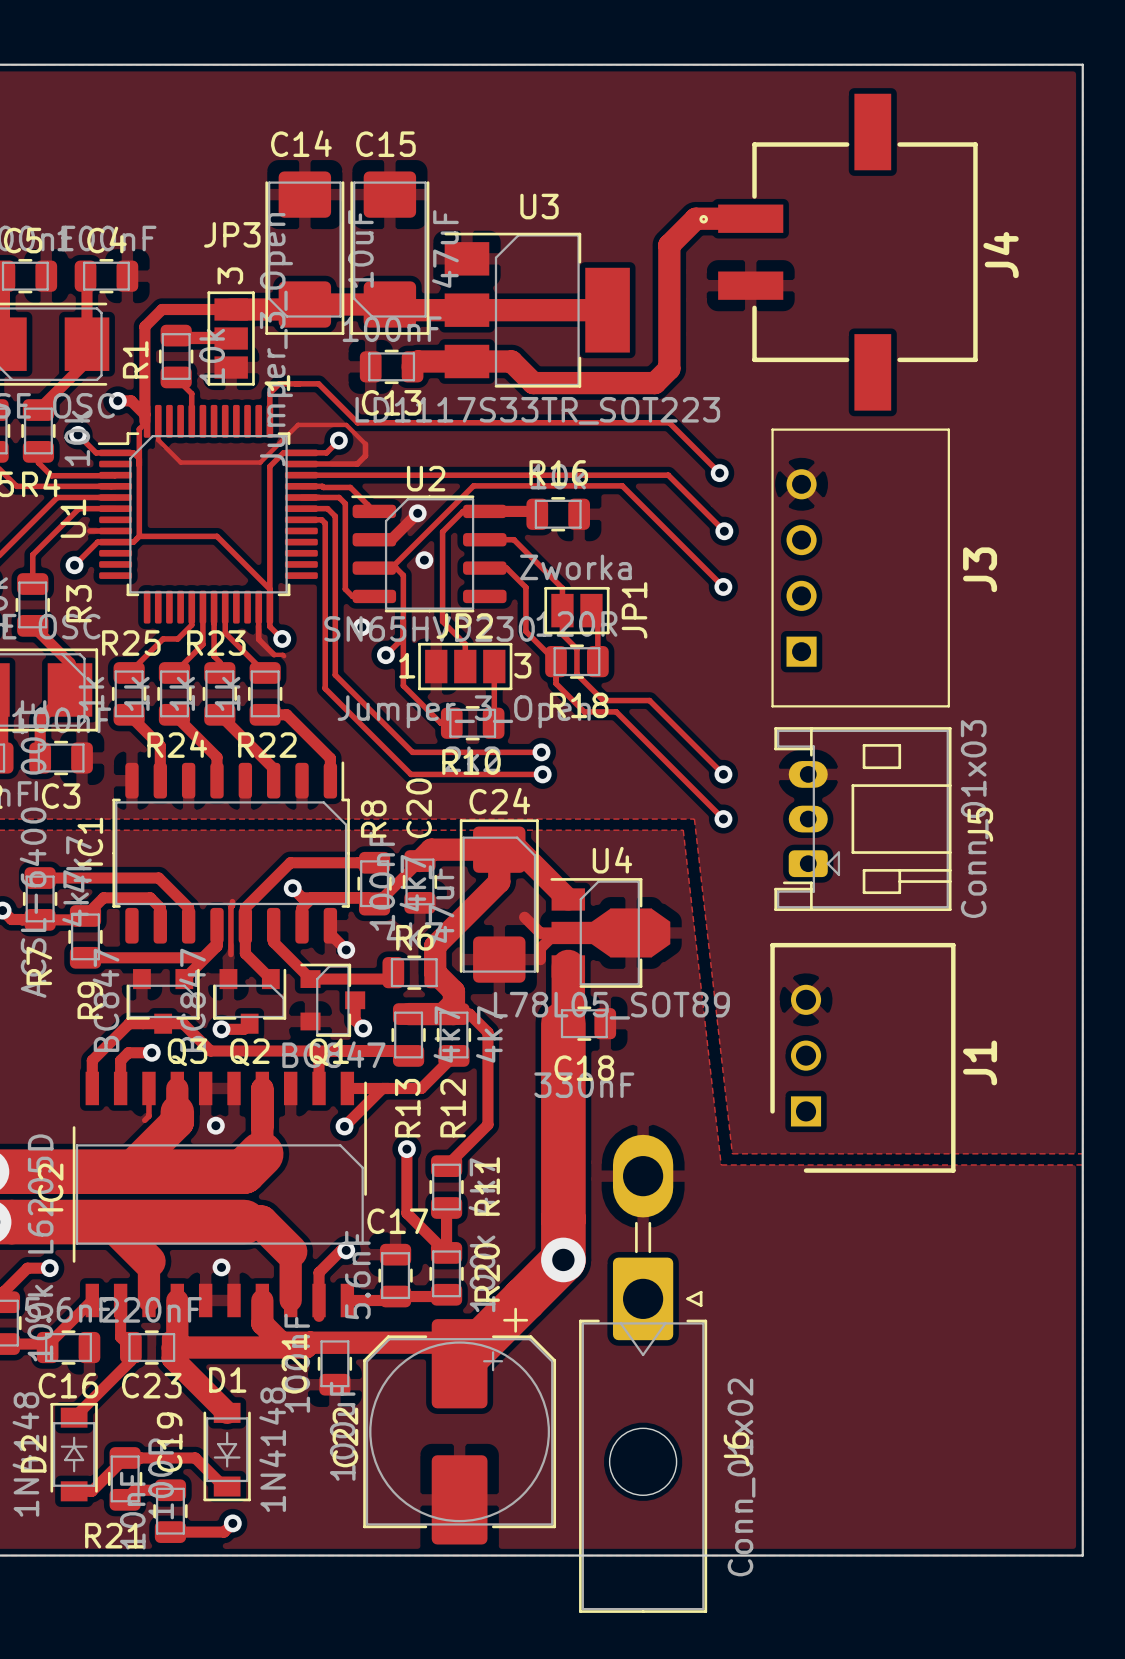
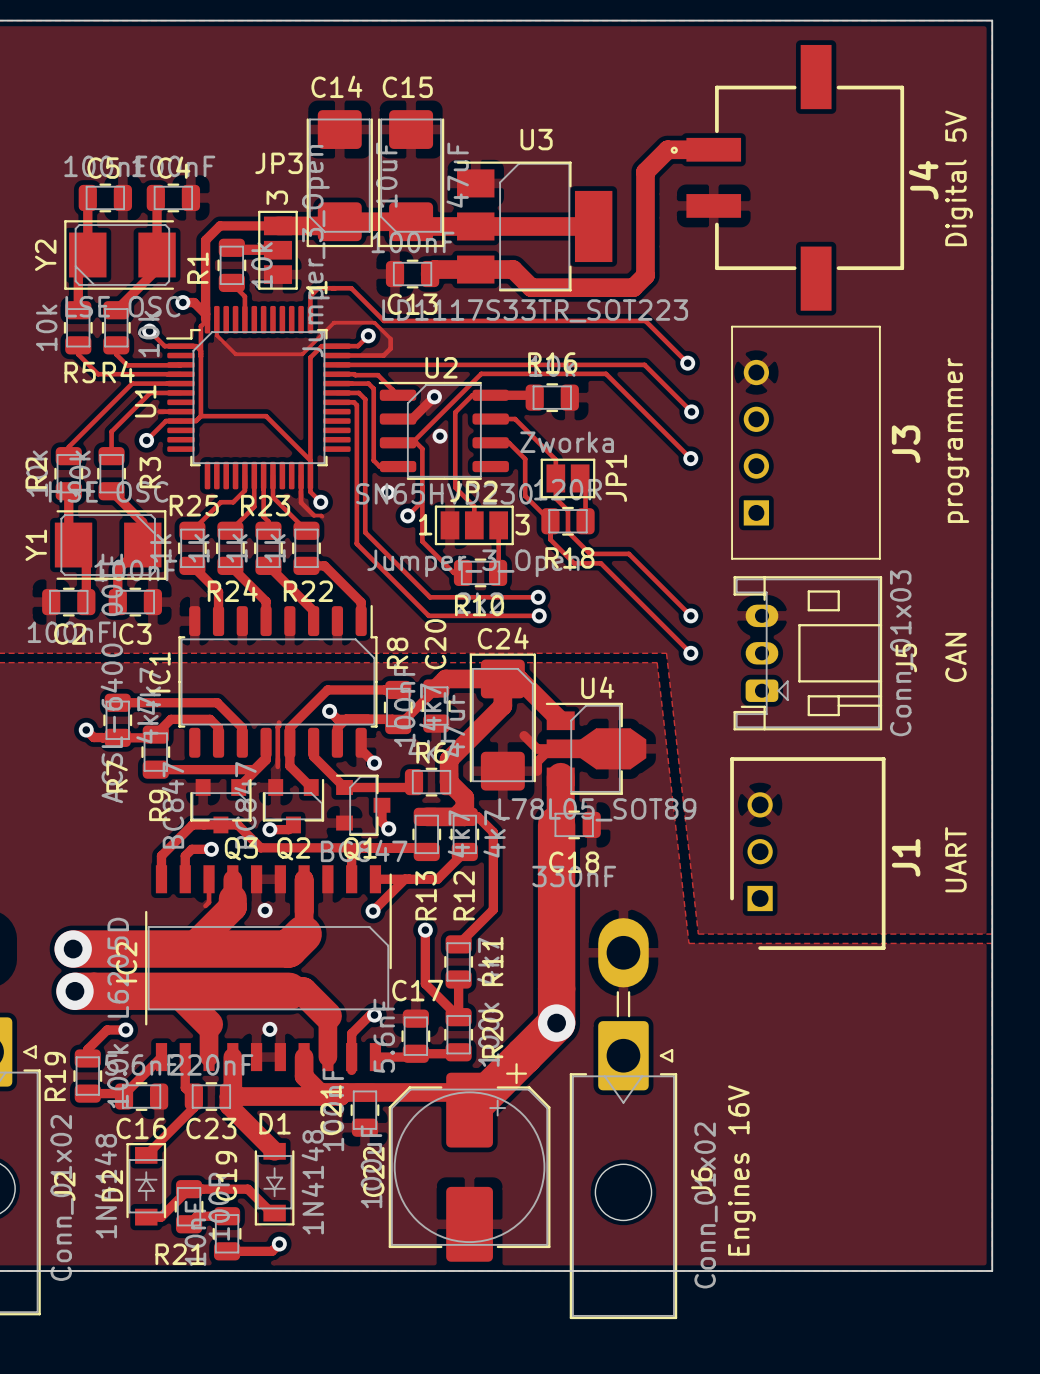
text: none -> Digital 5V (959, 178)
text: none -> programmer (958, 440)
text: none -> CAN (955, 657)
text: none -> UART (955, 859)
text: none -> Engines 16V (741, 1170)

